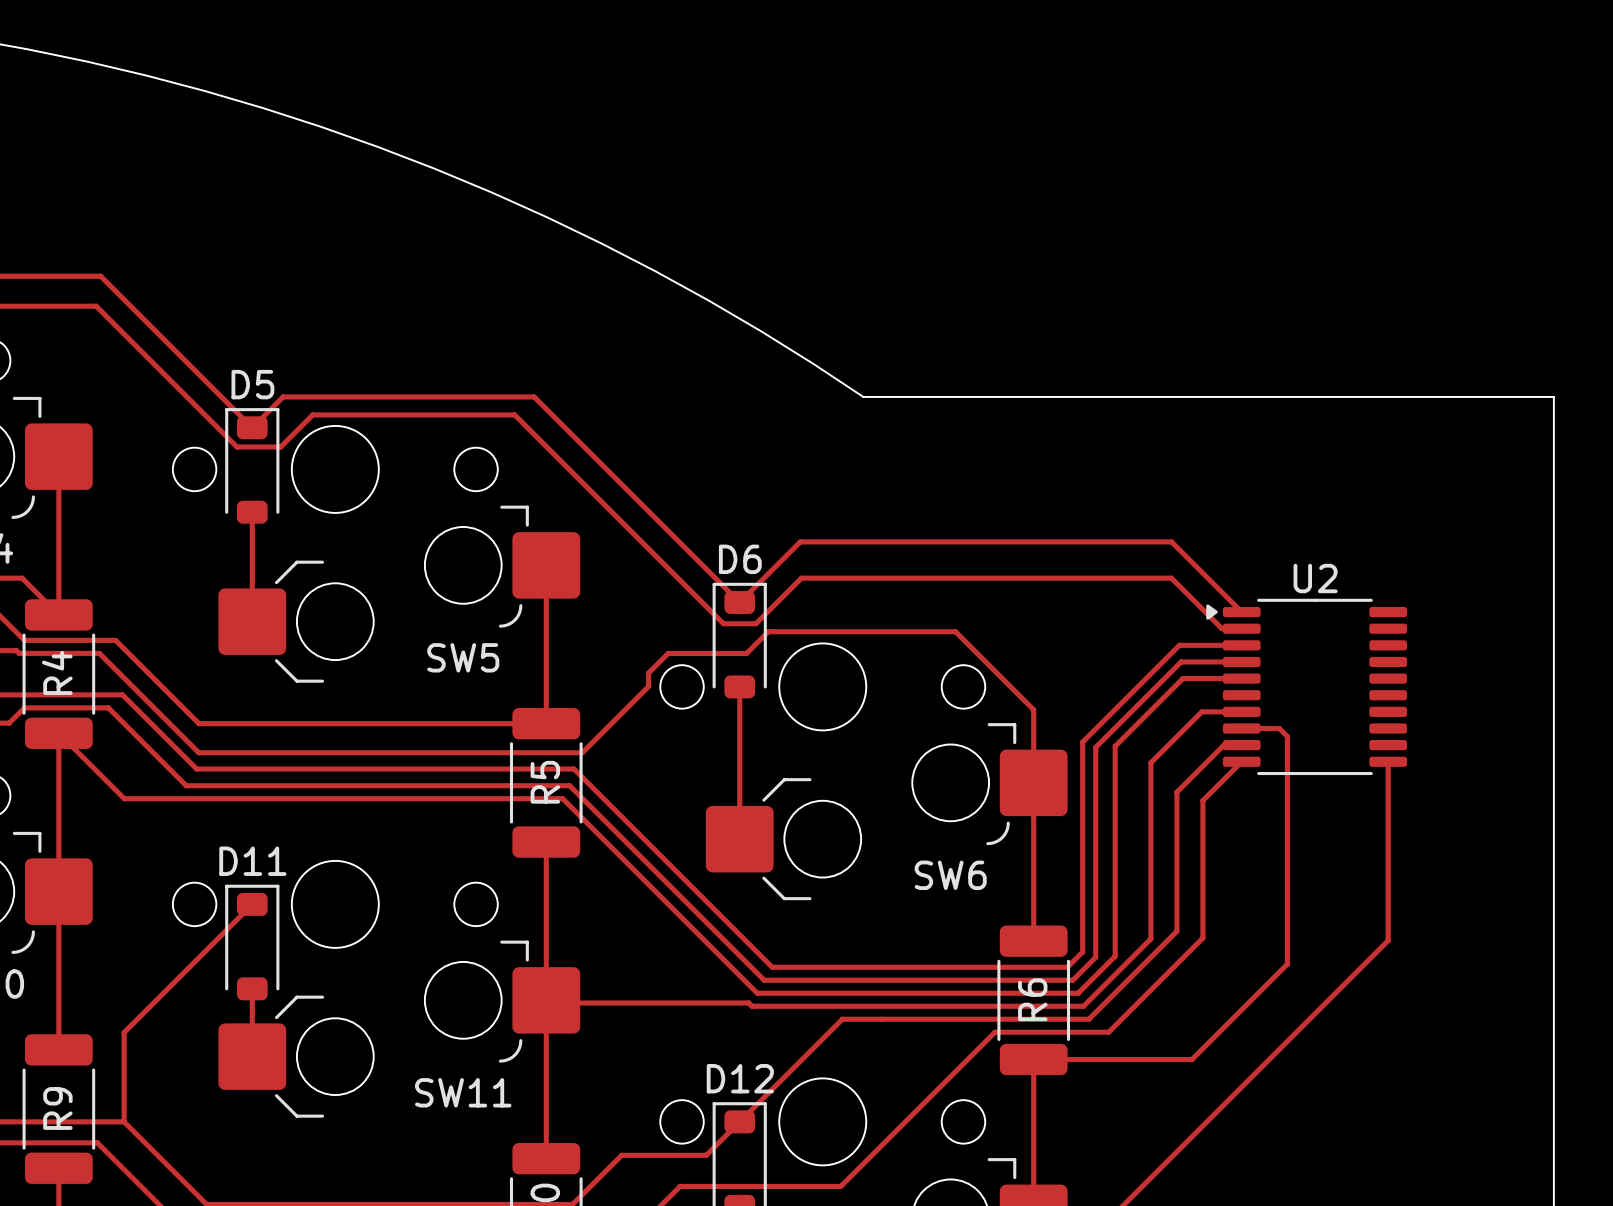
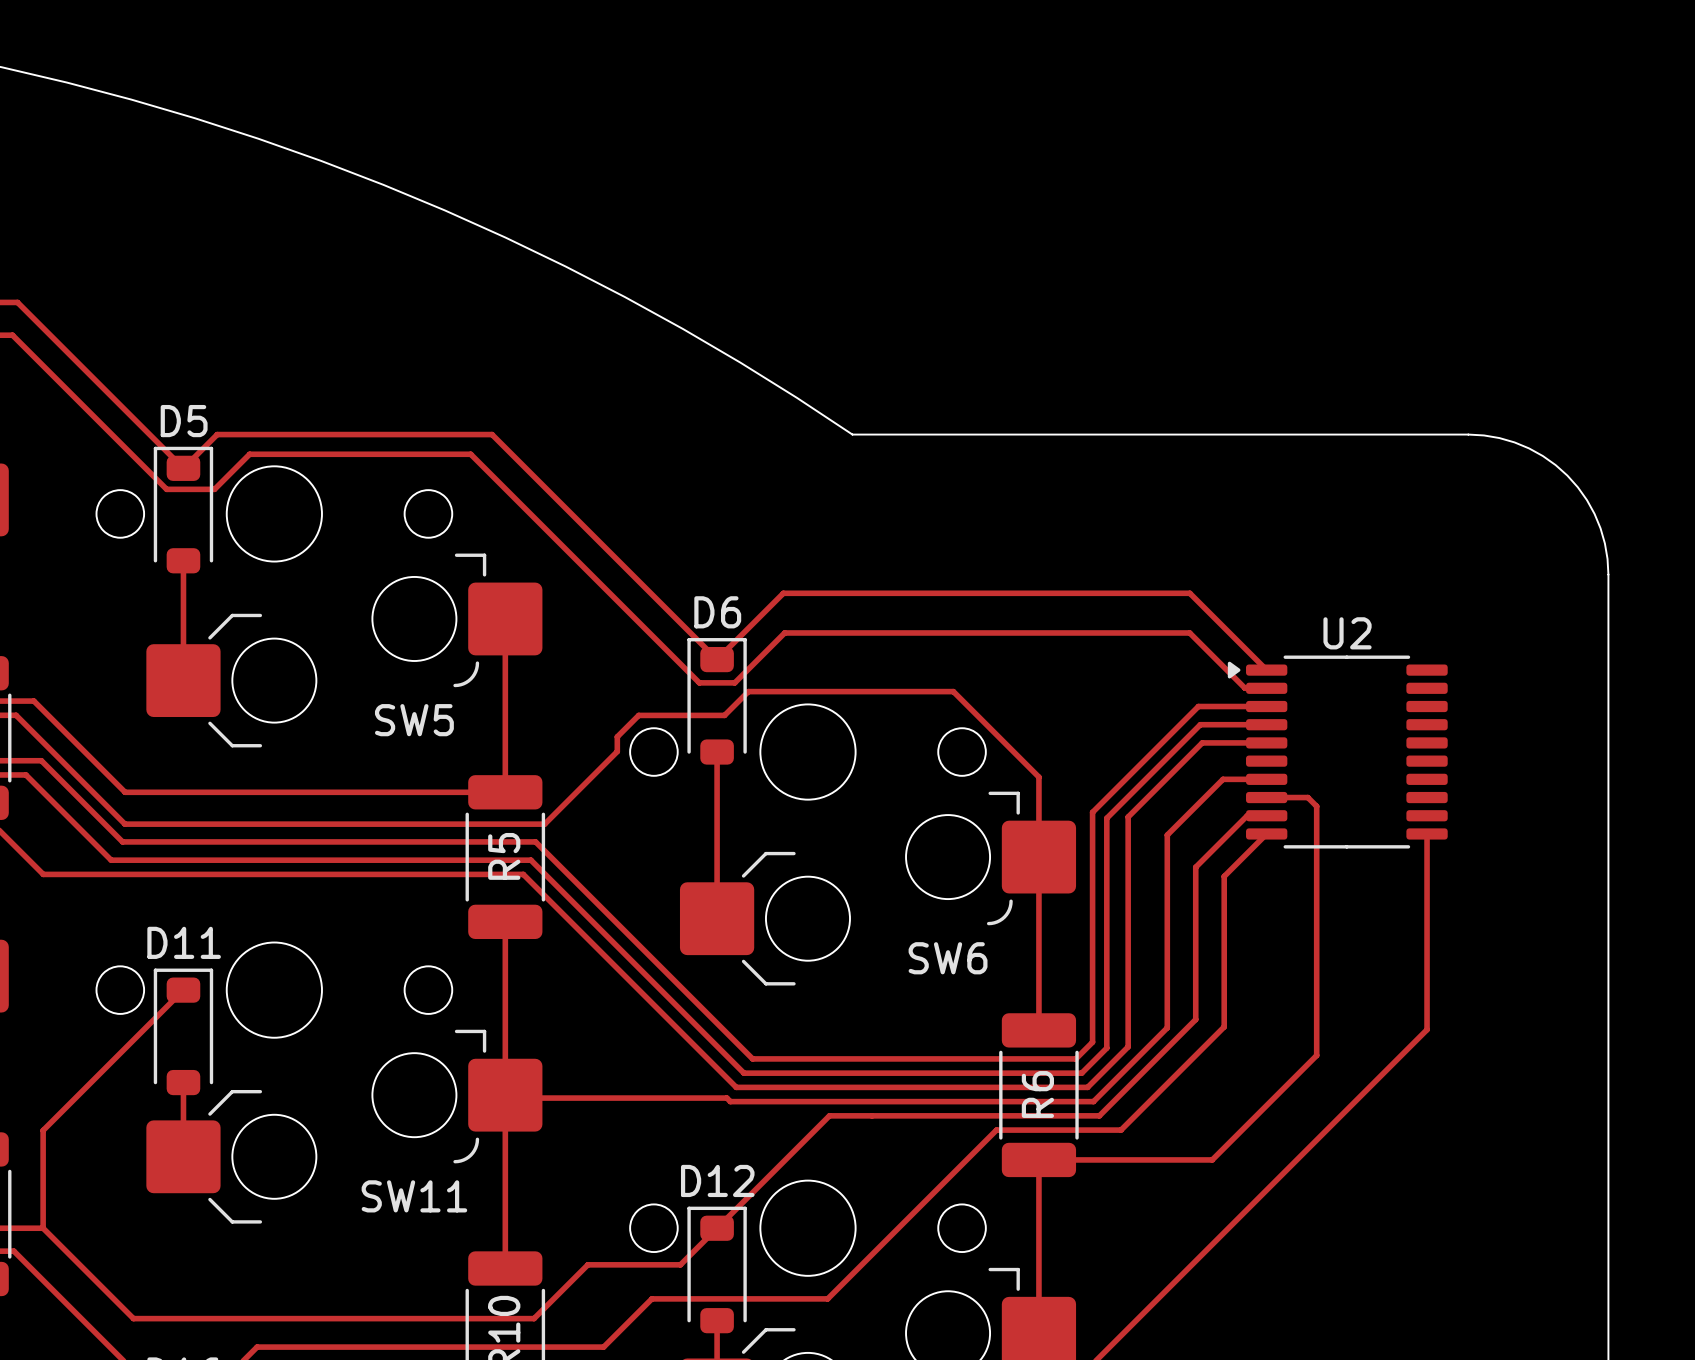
board edge: (1425, 396) (1553, 396) (1553, 524) -> (1468, 434) (1499, 438) (1529, 448) (1555, 465) (1567, 475) (1586, 500) (1594, 513) (1604, 543) (1608, 574)

